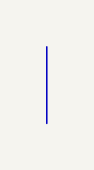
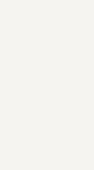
line: (46, 46) (46, 123) -> none

